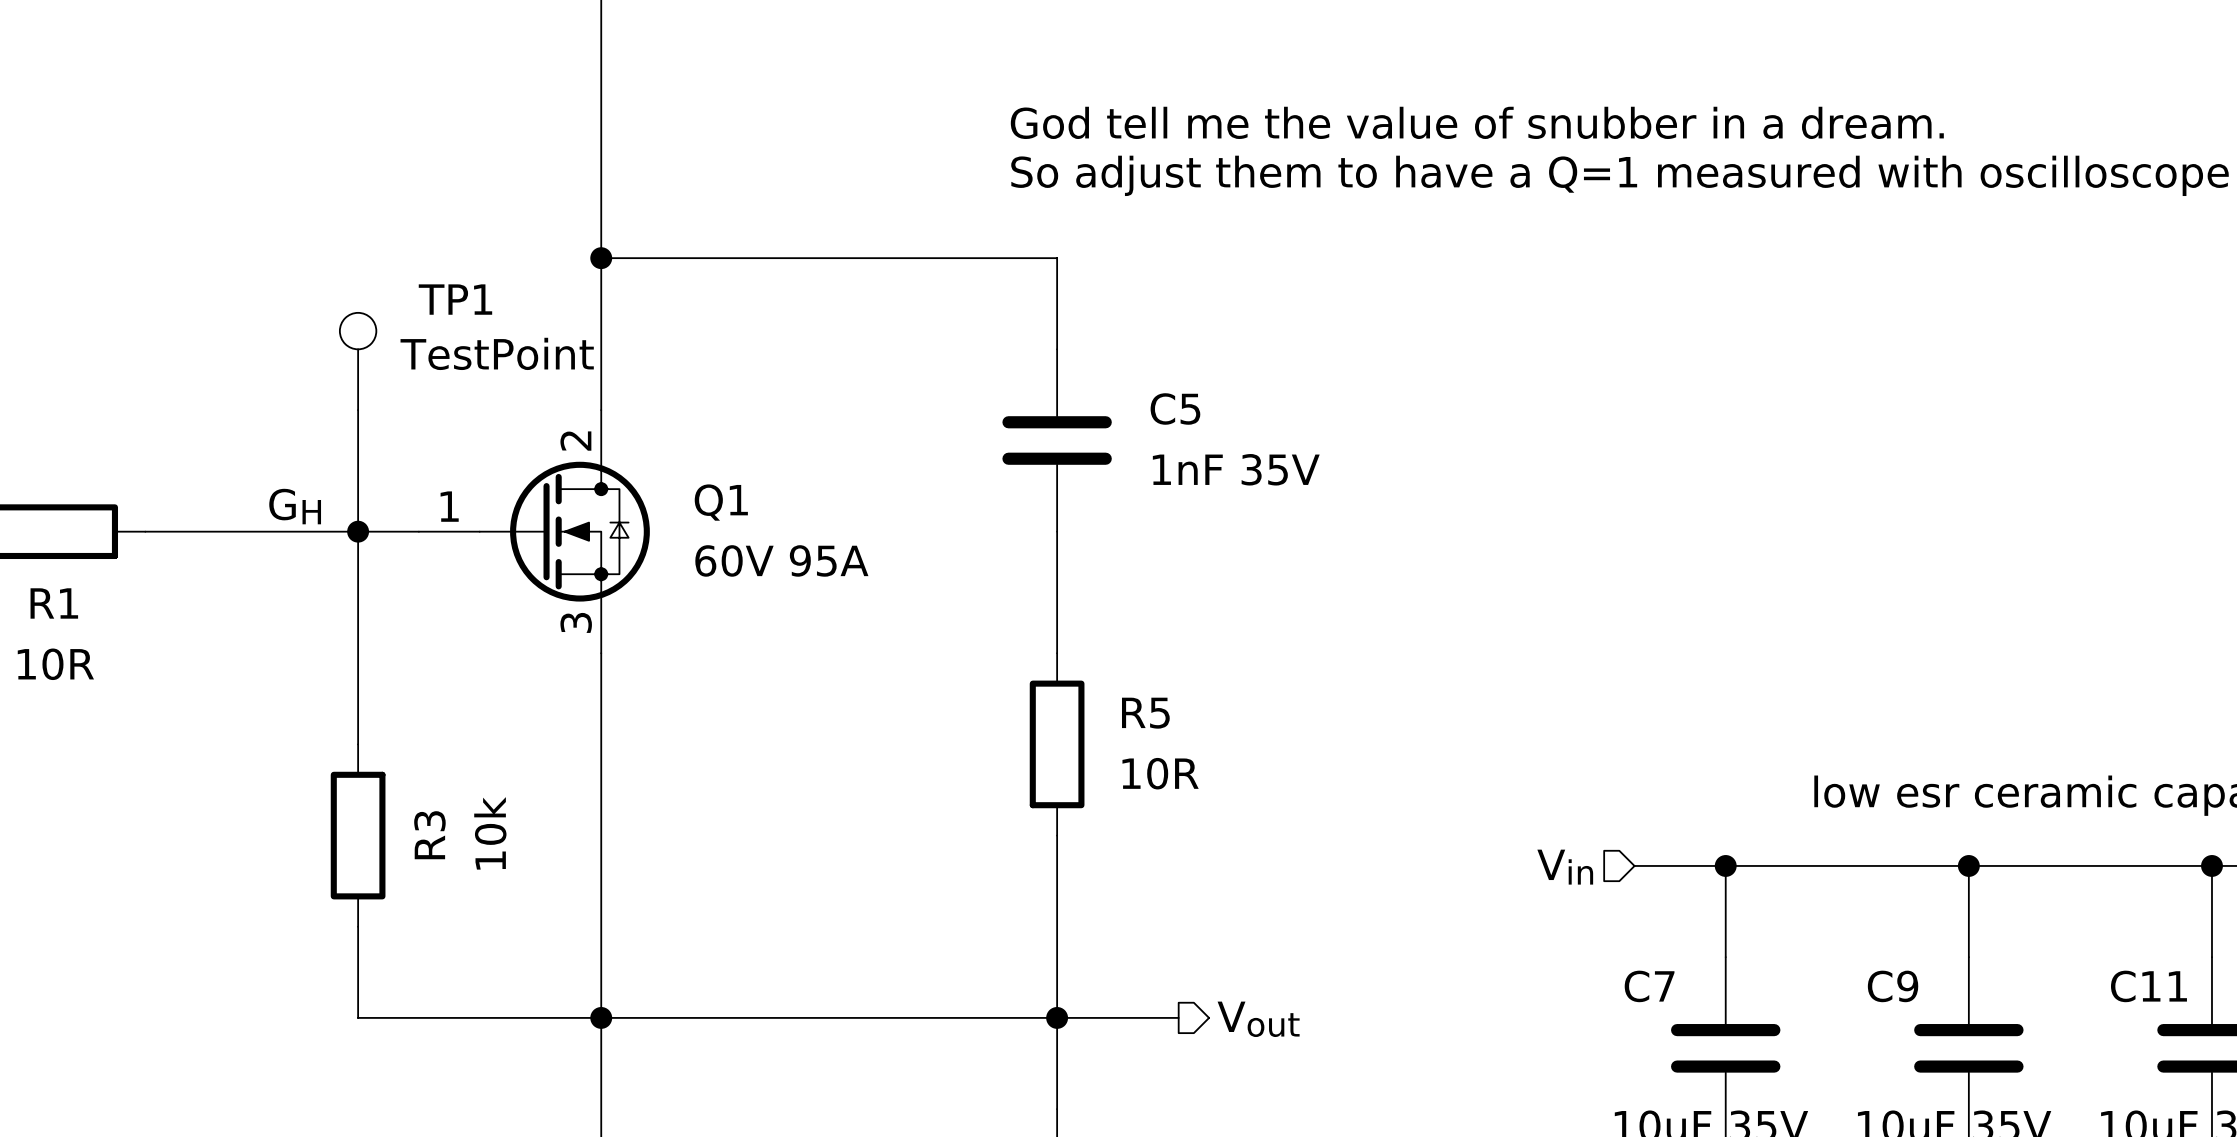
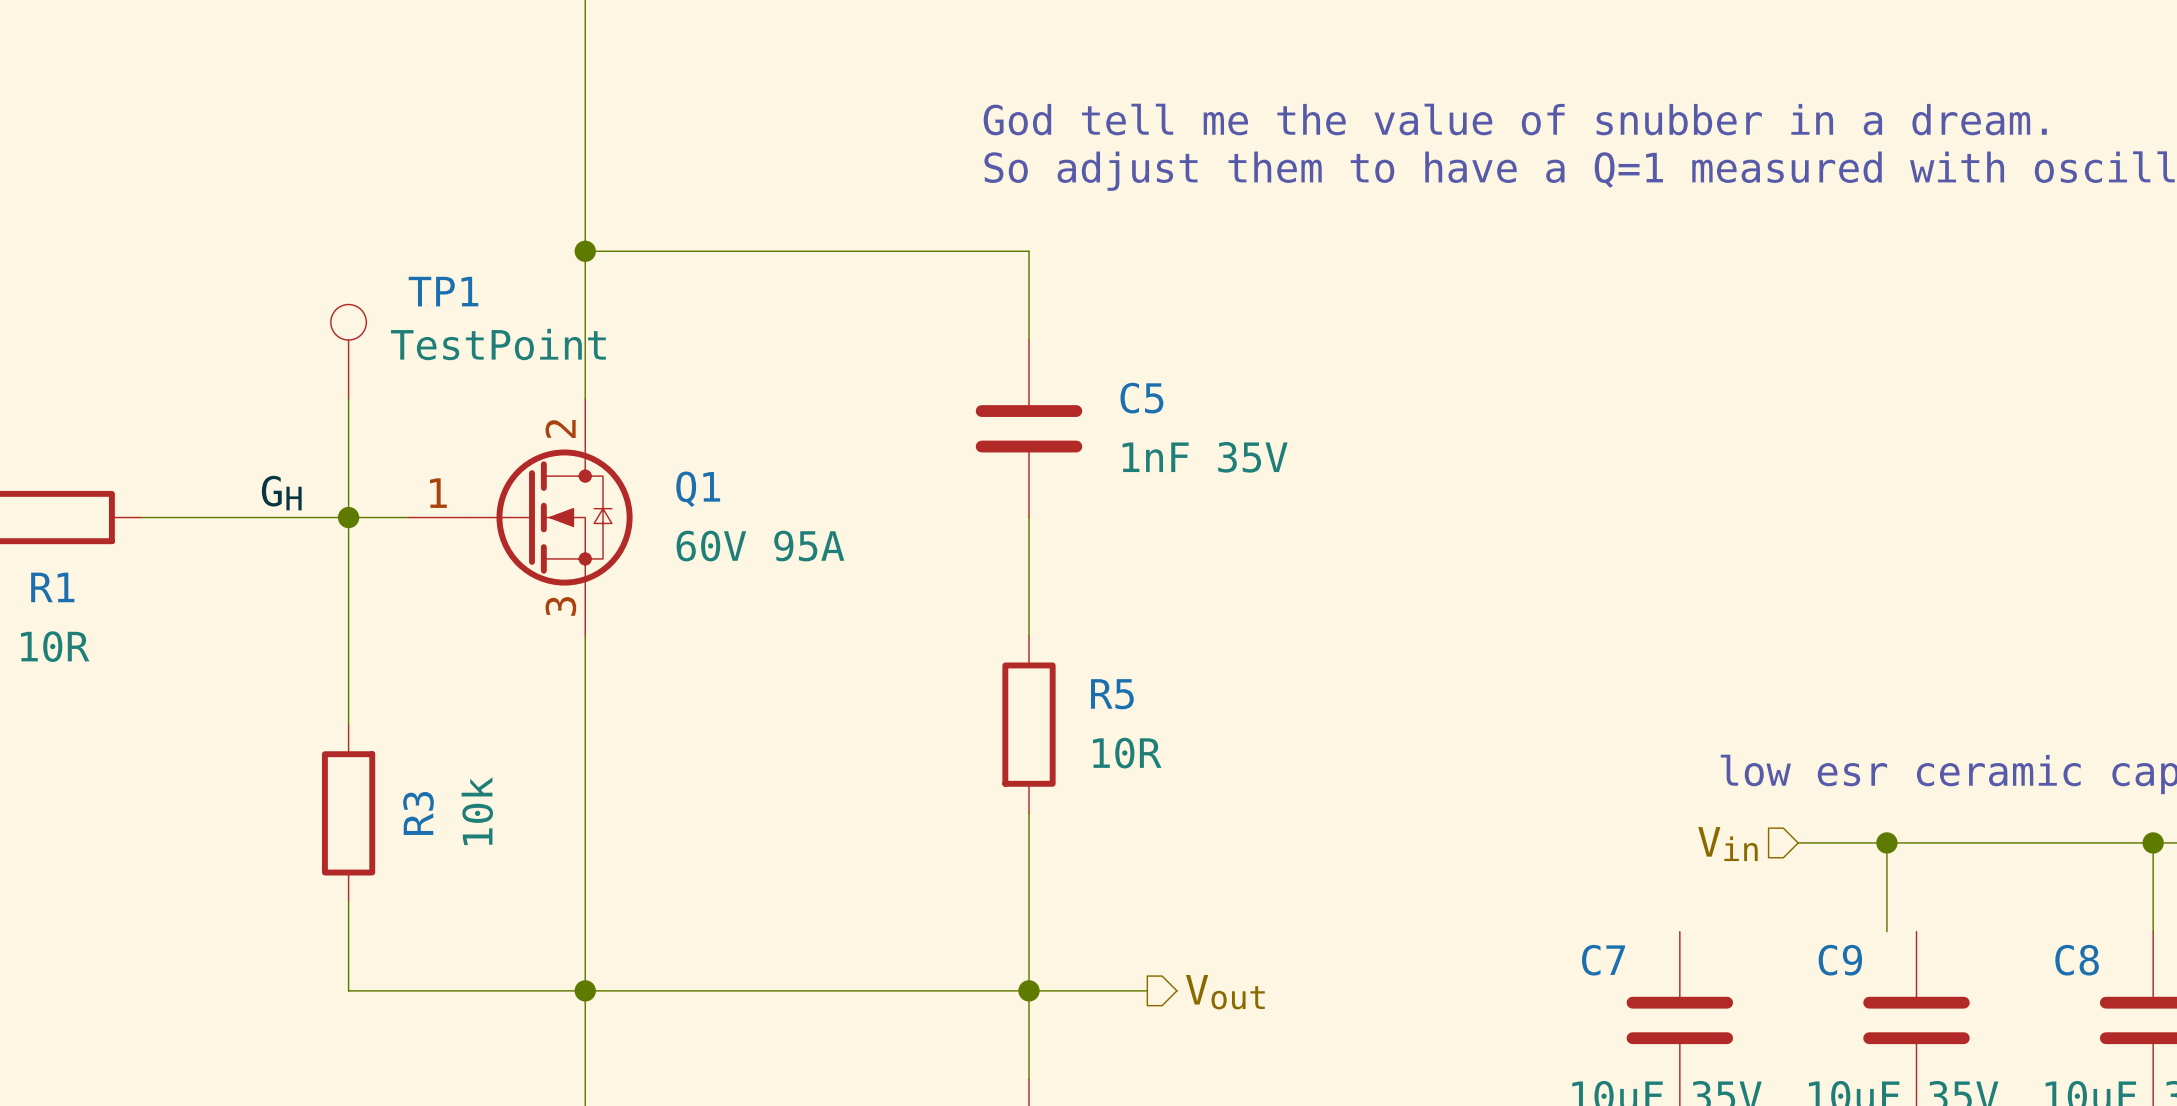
wire: (1634, 865) (1847, 865) -> none
wire: (1725, 865) (1725, 957) -> none
junction: (1725, 865) -> none
wire: (1968, 865) (1968, 957) -> (1886, 842) (1886, 931)
junction position: (1968, 865) -> (1886, 842)
hierarchical label position: Vin (1565, 867) -> Vin (1727, 844)
C11 name: C11 (2148, 986) -> C8 (2077, 960)

